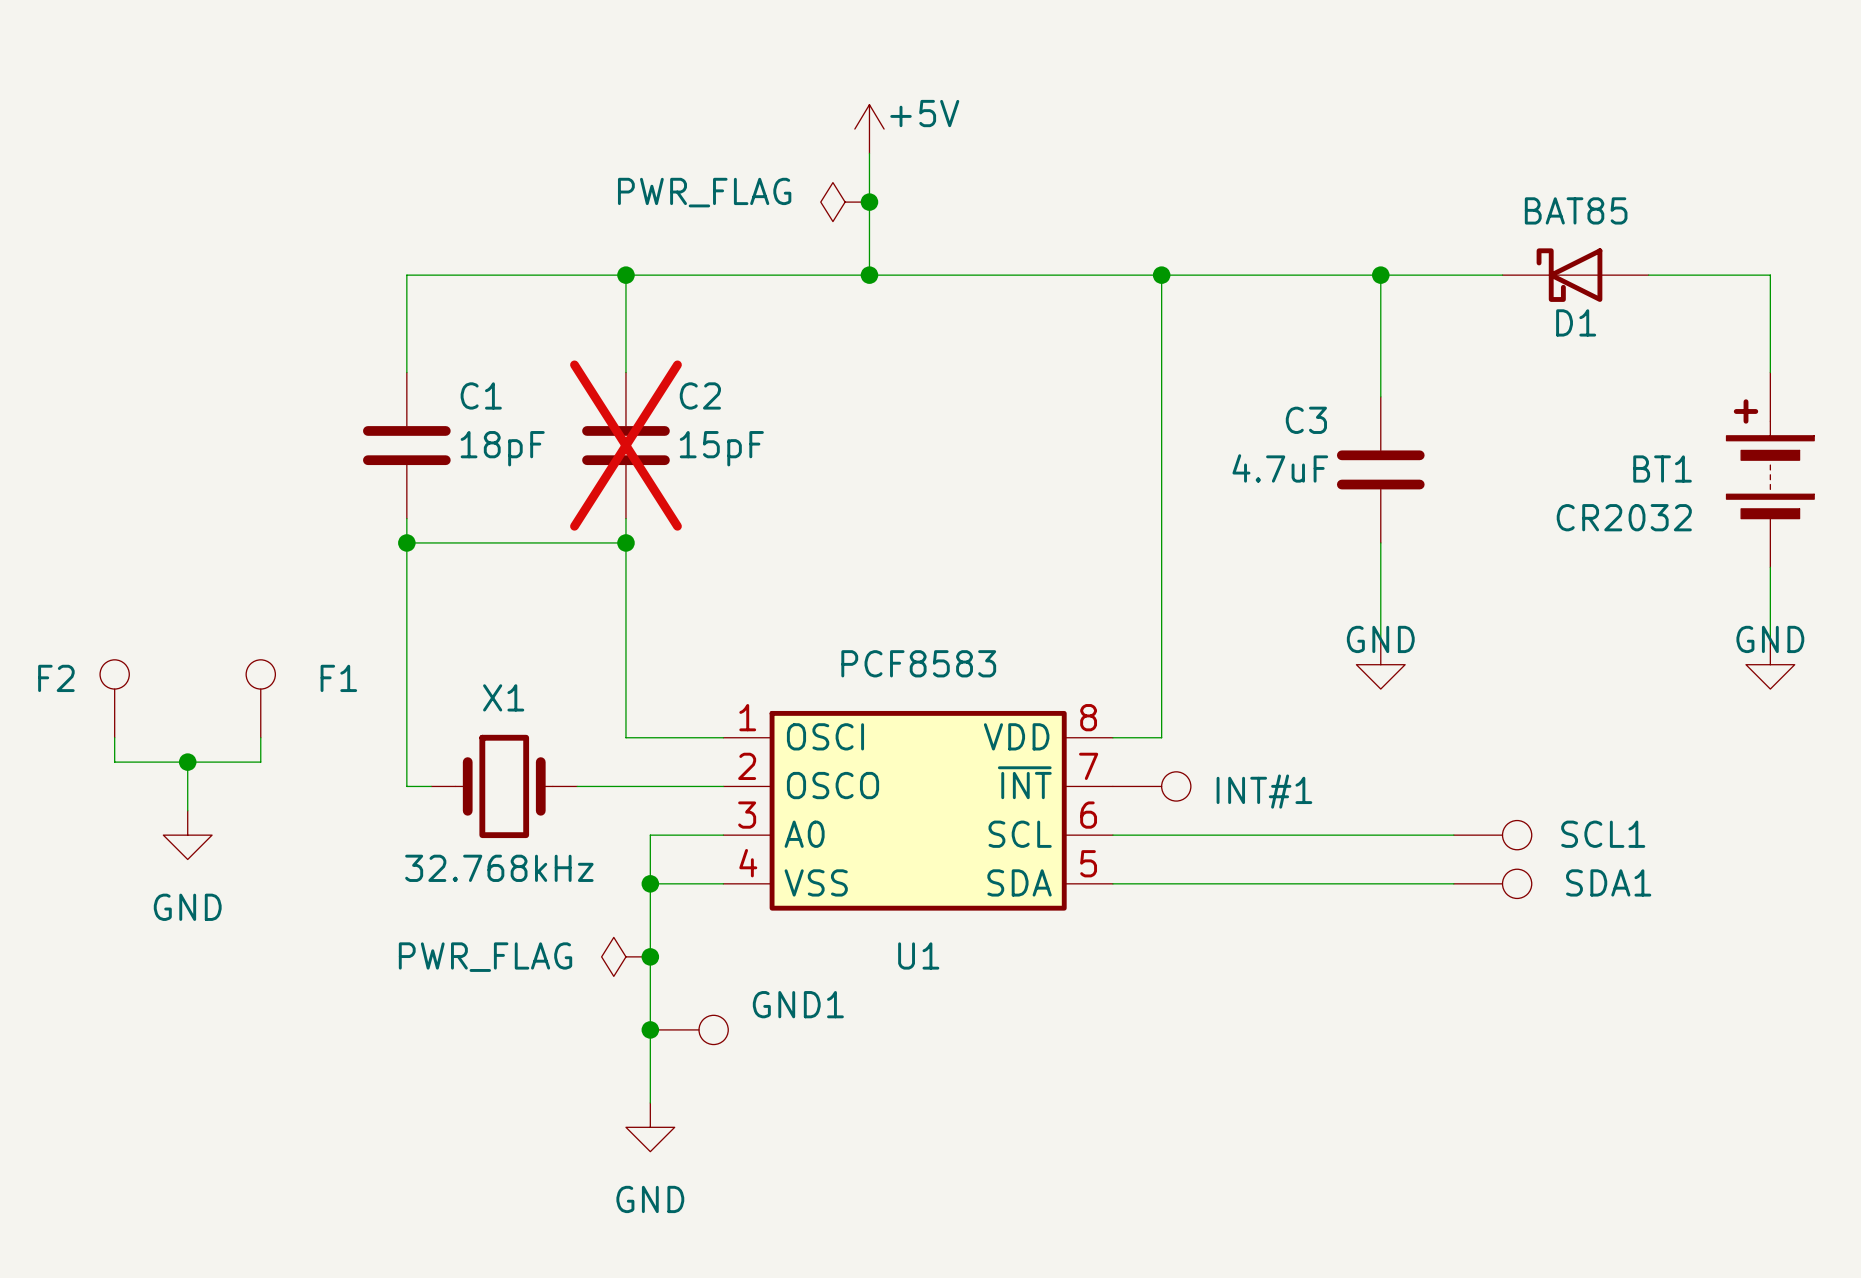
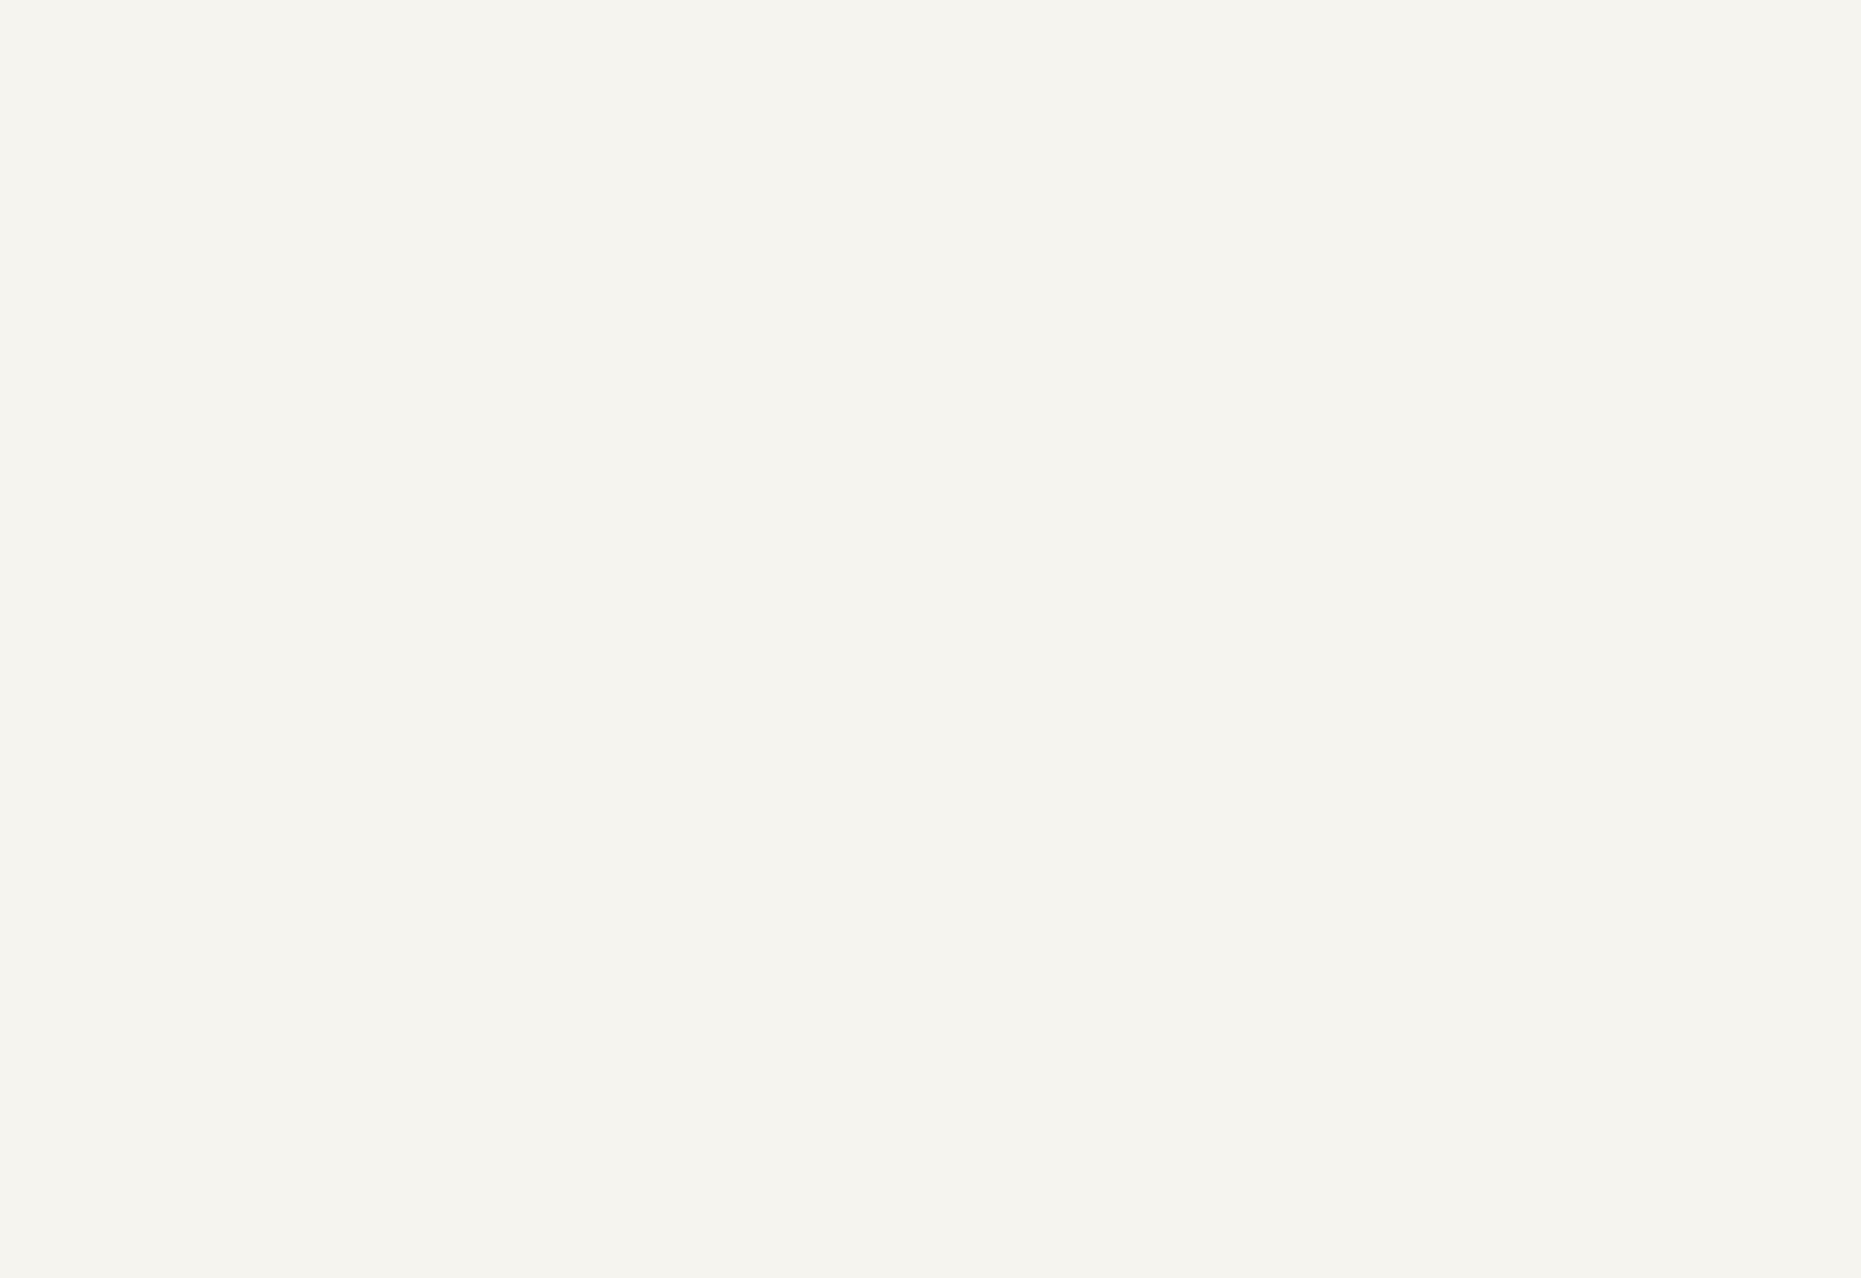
power symbol: +5V (869, 129) -> none
wire: (869, 153) (869, 275) -> none
power symbol: PWR_FLAG (845, 202) -> none
junction: (869, 202) -> none
wire: (625, 275) (625, 372) -> none
junction: (625, 275) -> none
junction: (869, 275) -> none
wire: (1161, 275) (1161, 737) (1112, 737) -> none
junction: (1161, 275) -> none
wire: (1380, 275) (1380, 396) -> none
junction: (1380, 275) -> none
wire: (1502, 275) (406, 275) (406, 372) -> none
D1: BAT85 (1575, 275) -> none
wire: (1648, 275) (1770, 275) (1770, 372) -> none
C1: 18pF (406, 445) -> none
C2: 15pF (625, 445) -> none
C3: 4.7uF (1380, 469) -> none
BT1: CR2032 (1770, 469) -> none
wire: (406, 518) (406, 786) (431, 786) -> none
wire: (625, 518) (625, 737) (723, 737) -> none
wire: (406, 542) (625, 542) -> none
junction: (406, 542) -> none
junction: (625, 542) -> none
wire: (1380, 542) (1380, 640) -> none
wire: (1770, 567) (1770, 640) -> none
power symbol: GND (1380, 664) -> none
power symbol: GND (1770, 664) -> none
F2: (114, 698) -> none
F1: (260, 698) -> none
wire: (114, 737) (114, 762) (260, 762) (260, 737) -> none
wire: (187, 762) (187, 810) -> none
junction: (187, 762) -> none
X1: 32.768kHz (504, 786) -> none
wire: (577, 786) (723, 786) -> none
INT#1: (1151, 786) -> none
U1: PCF8583 (918, 810) -> none
power symbol: GND (187, 835) -> none
wire: (723, 835) (650, 835) (650, 1102) -> none
wire: (1112, 835) (1453, 835) -> none
SCL1: (1492, 835) -> none
wire: (650, 883) (723, 883) -> none
junction: (650, 883) -> none
wire: (1112, 883) (1453, 883) -> none
SDA1: (1492, 883) -> none
power symbol: PWR_FLAG (625, 956) -> none
junction: (650, 956) -> none
junction: (650, 1029) -> none
GND1: (689, 1029) -> none
power symbol: GND (650, 1127) -> none

